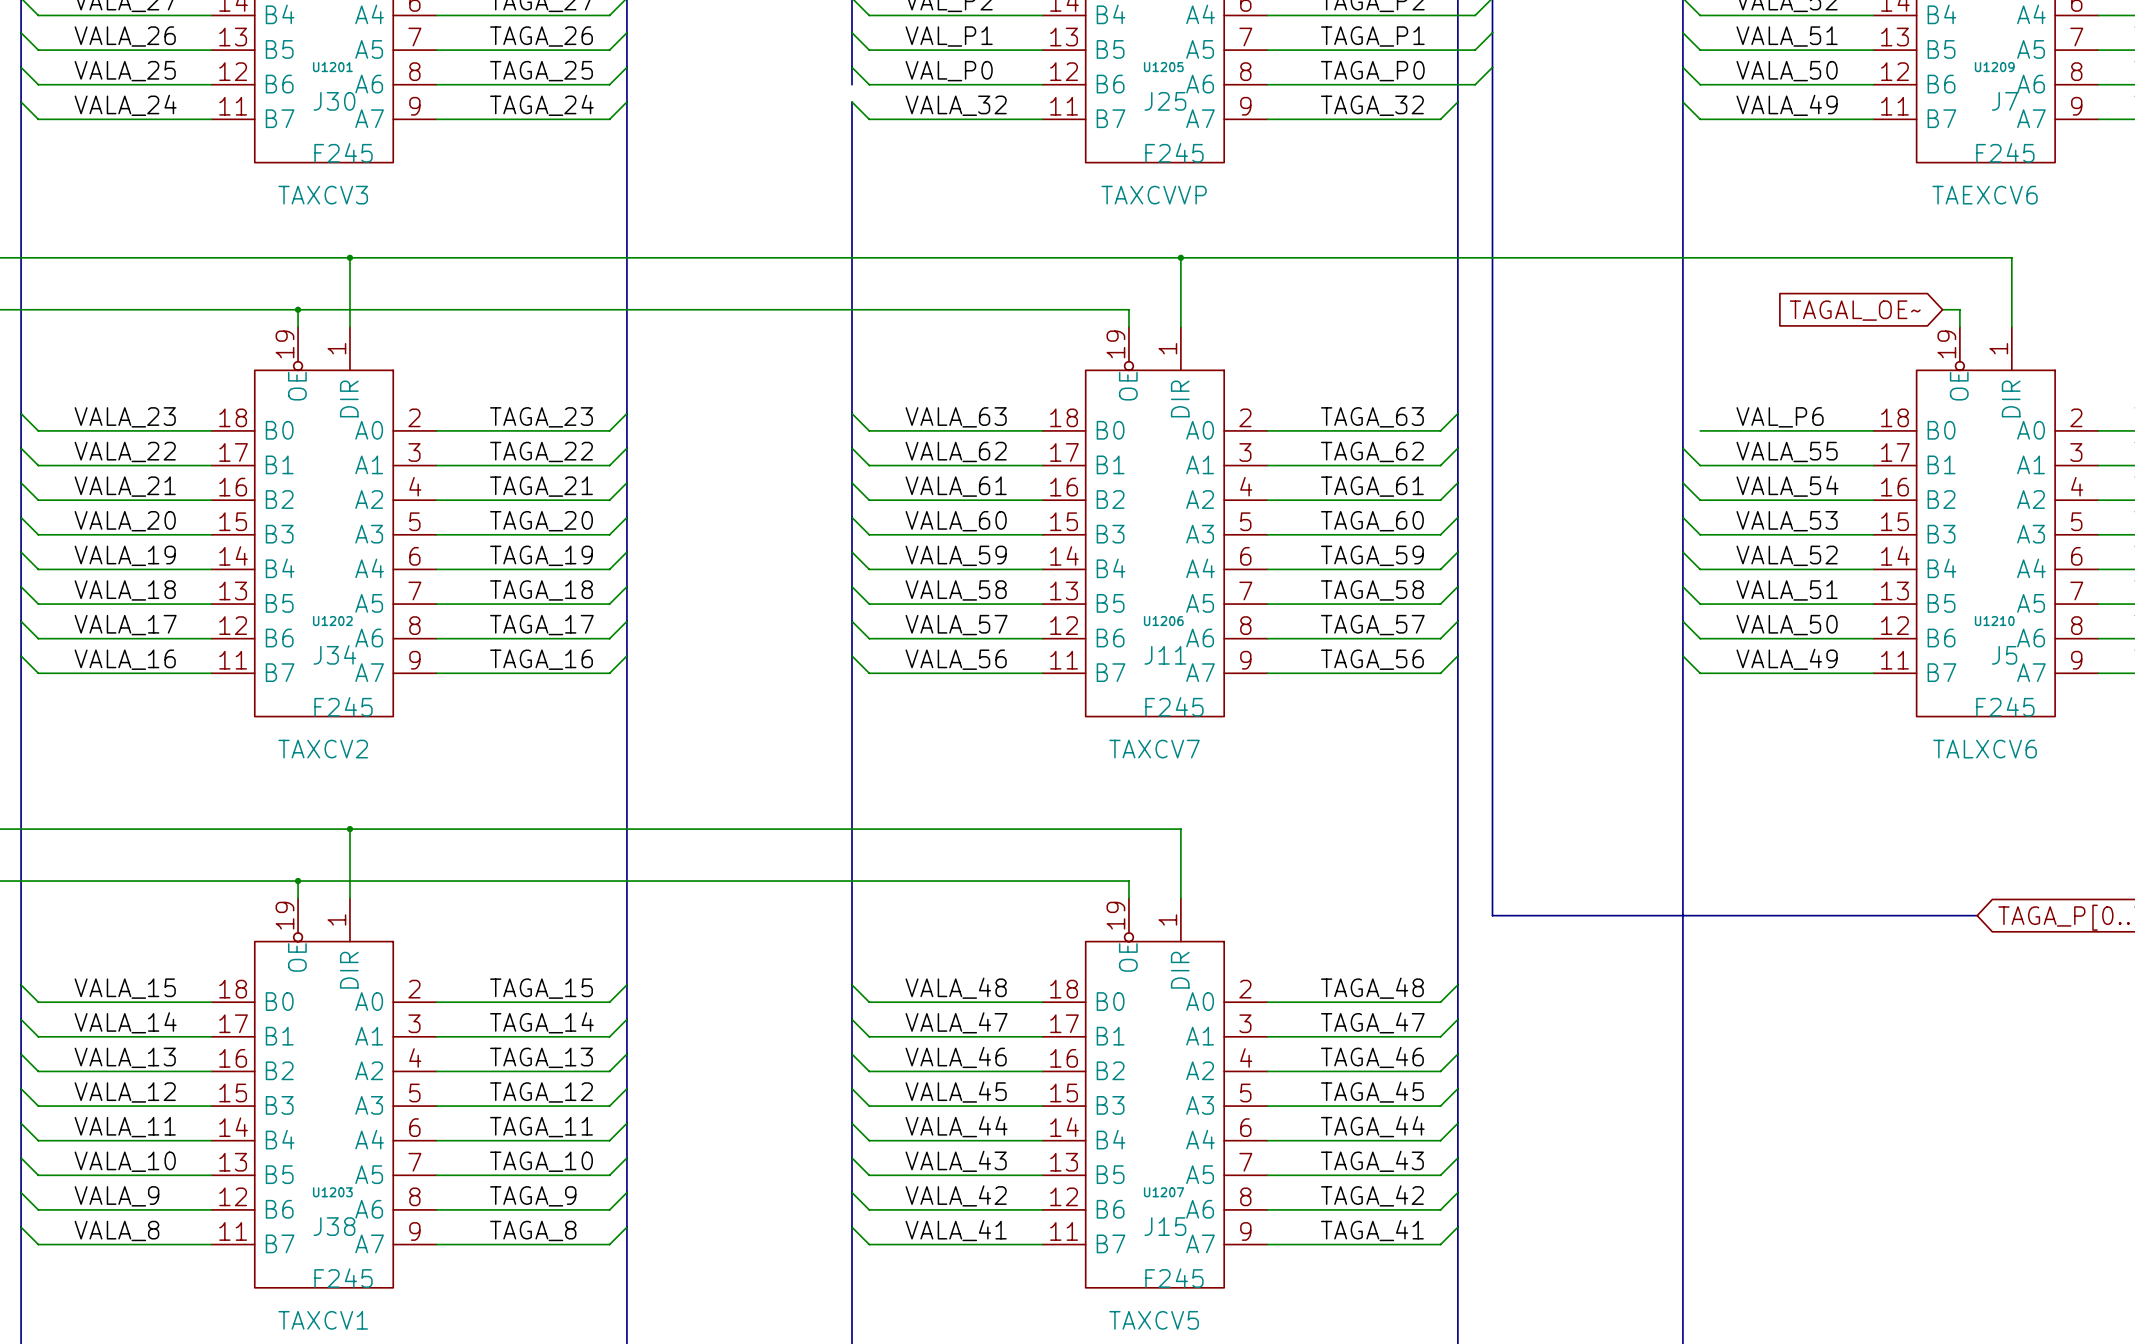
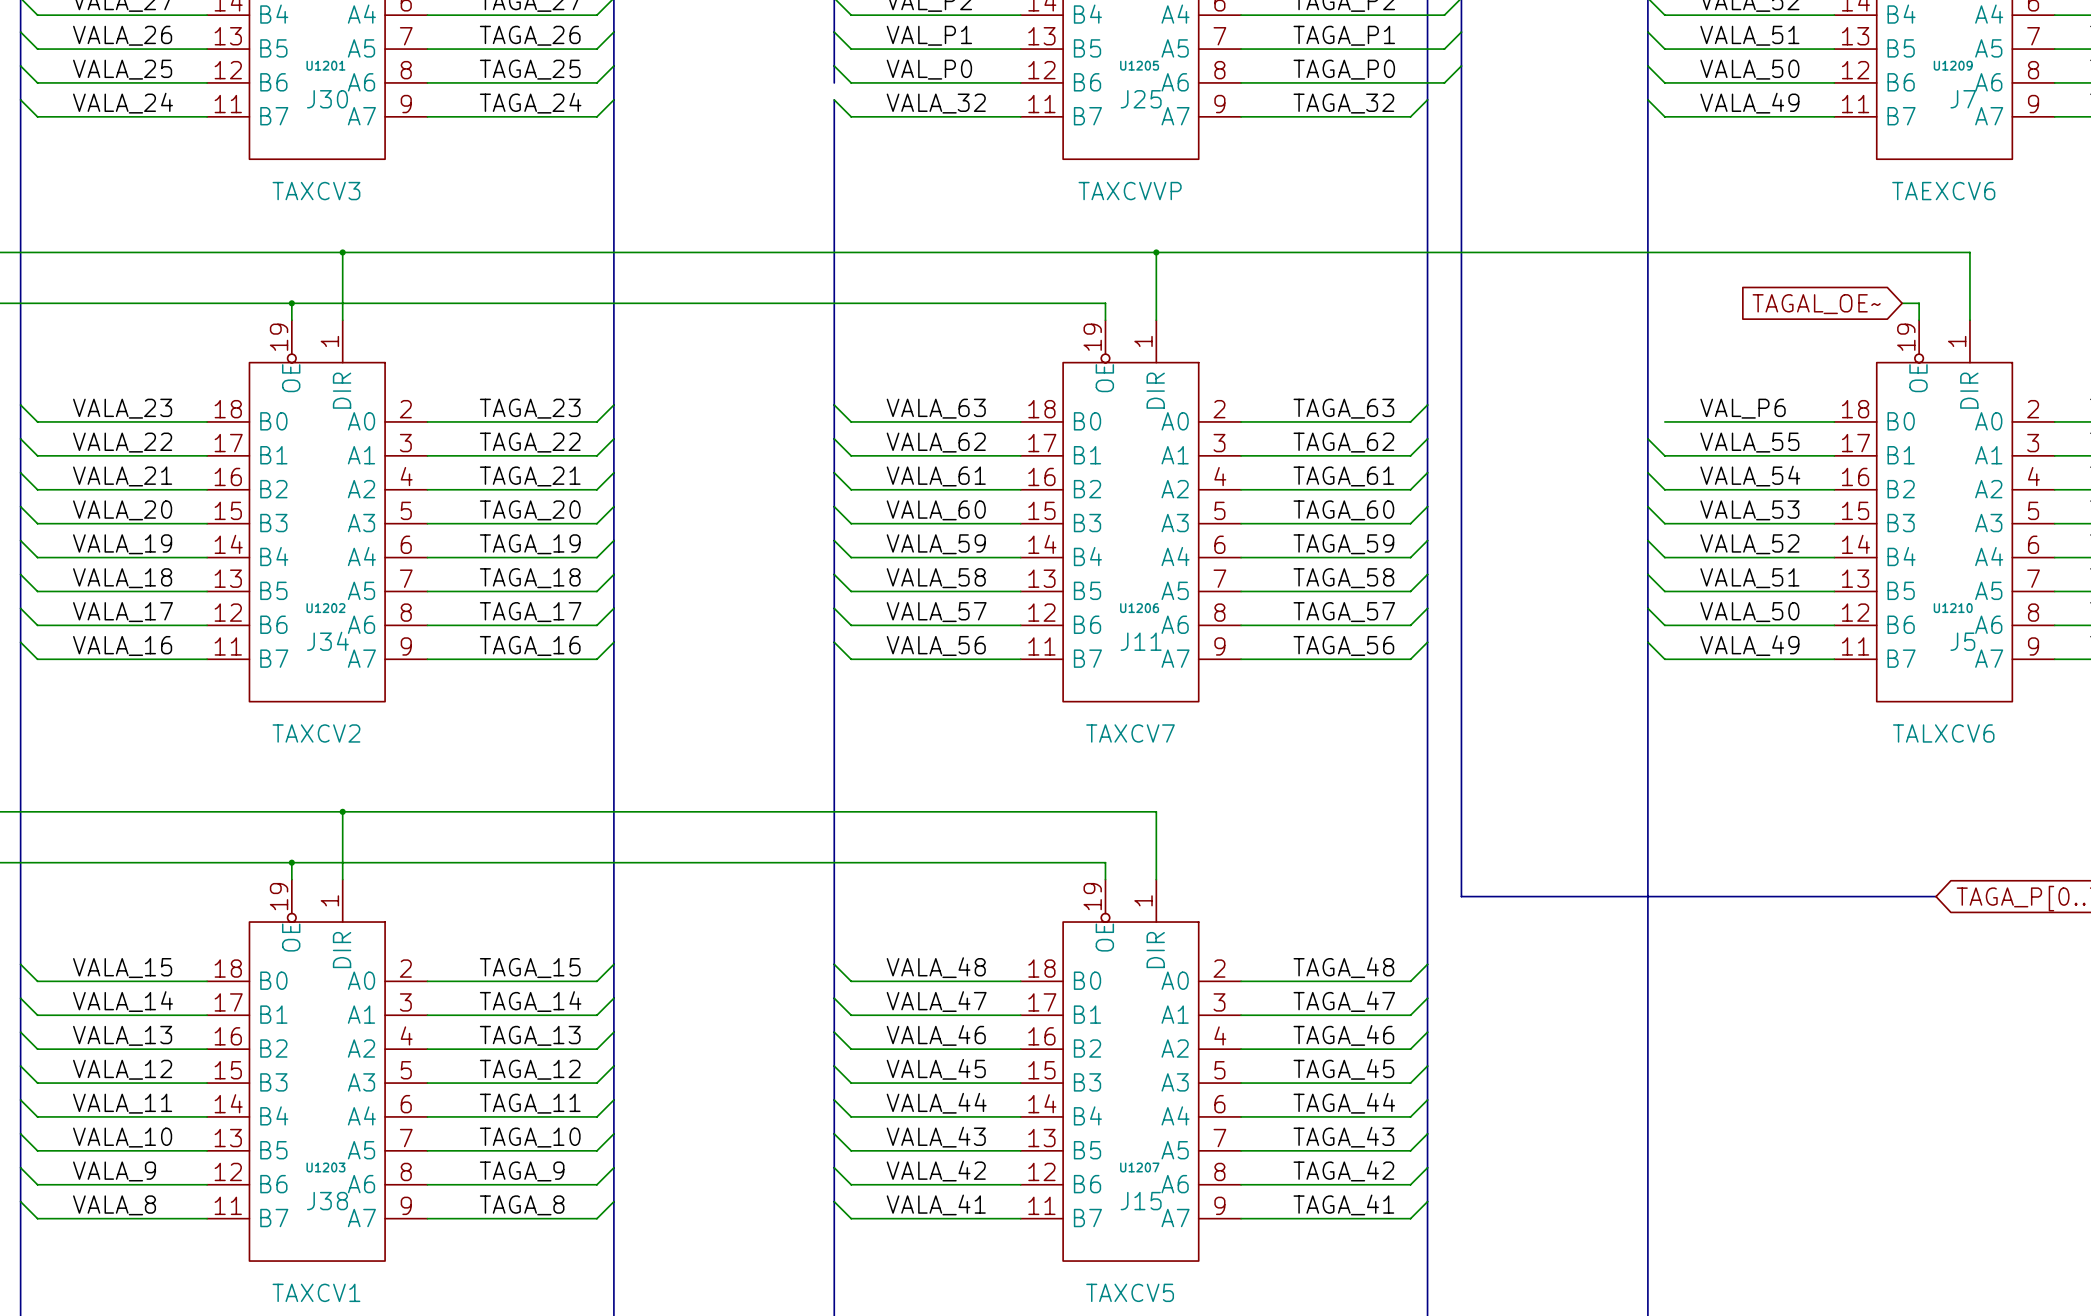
U1201 value: F245 (343, 152) -> none
U1205 value: F245 (1174, 152) -> none
U1209 value: F245 (2005, 152) -> none
U1202 value: F245 (343, 706) -> none
U1206 value: F245 (1174, 706) -> none
U1210 value: F245 (2005, 706) -> none
U1203 value: F245 (343, 1278) -> none
U1207 value: F245 (1174, 1278) -> none

